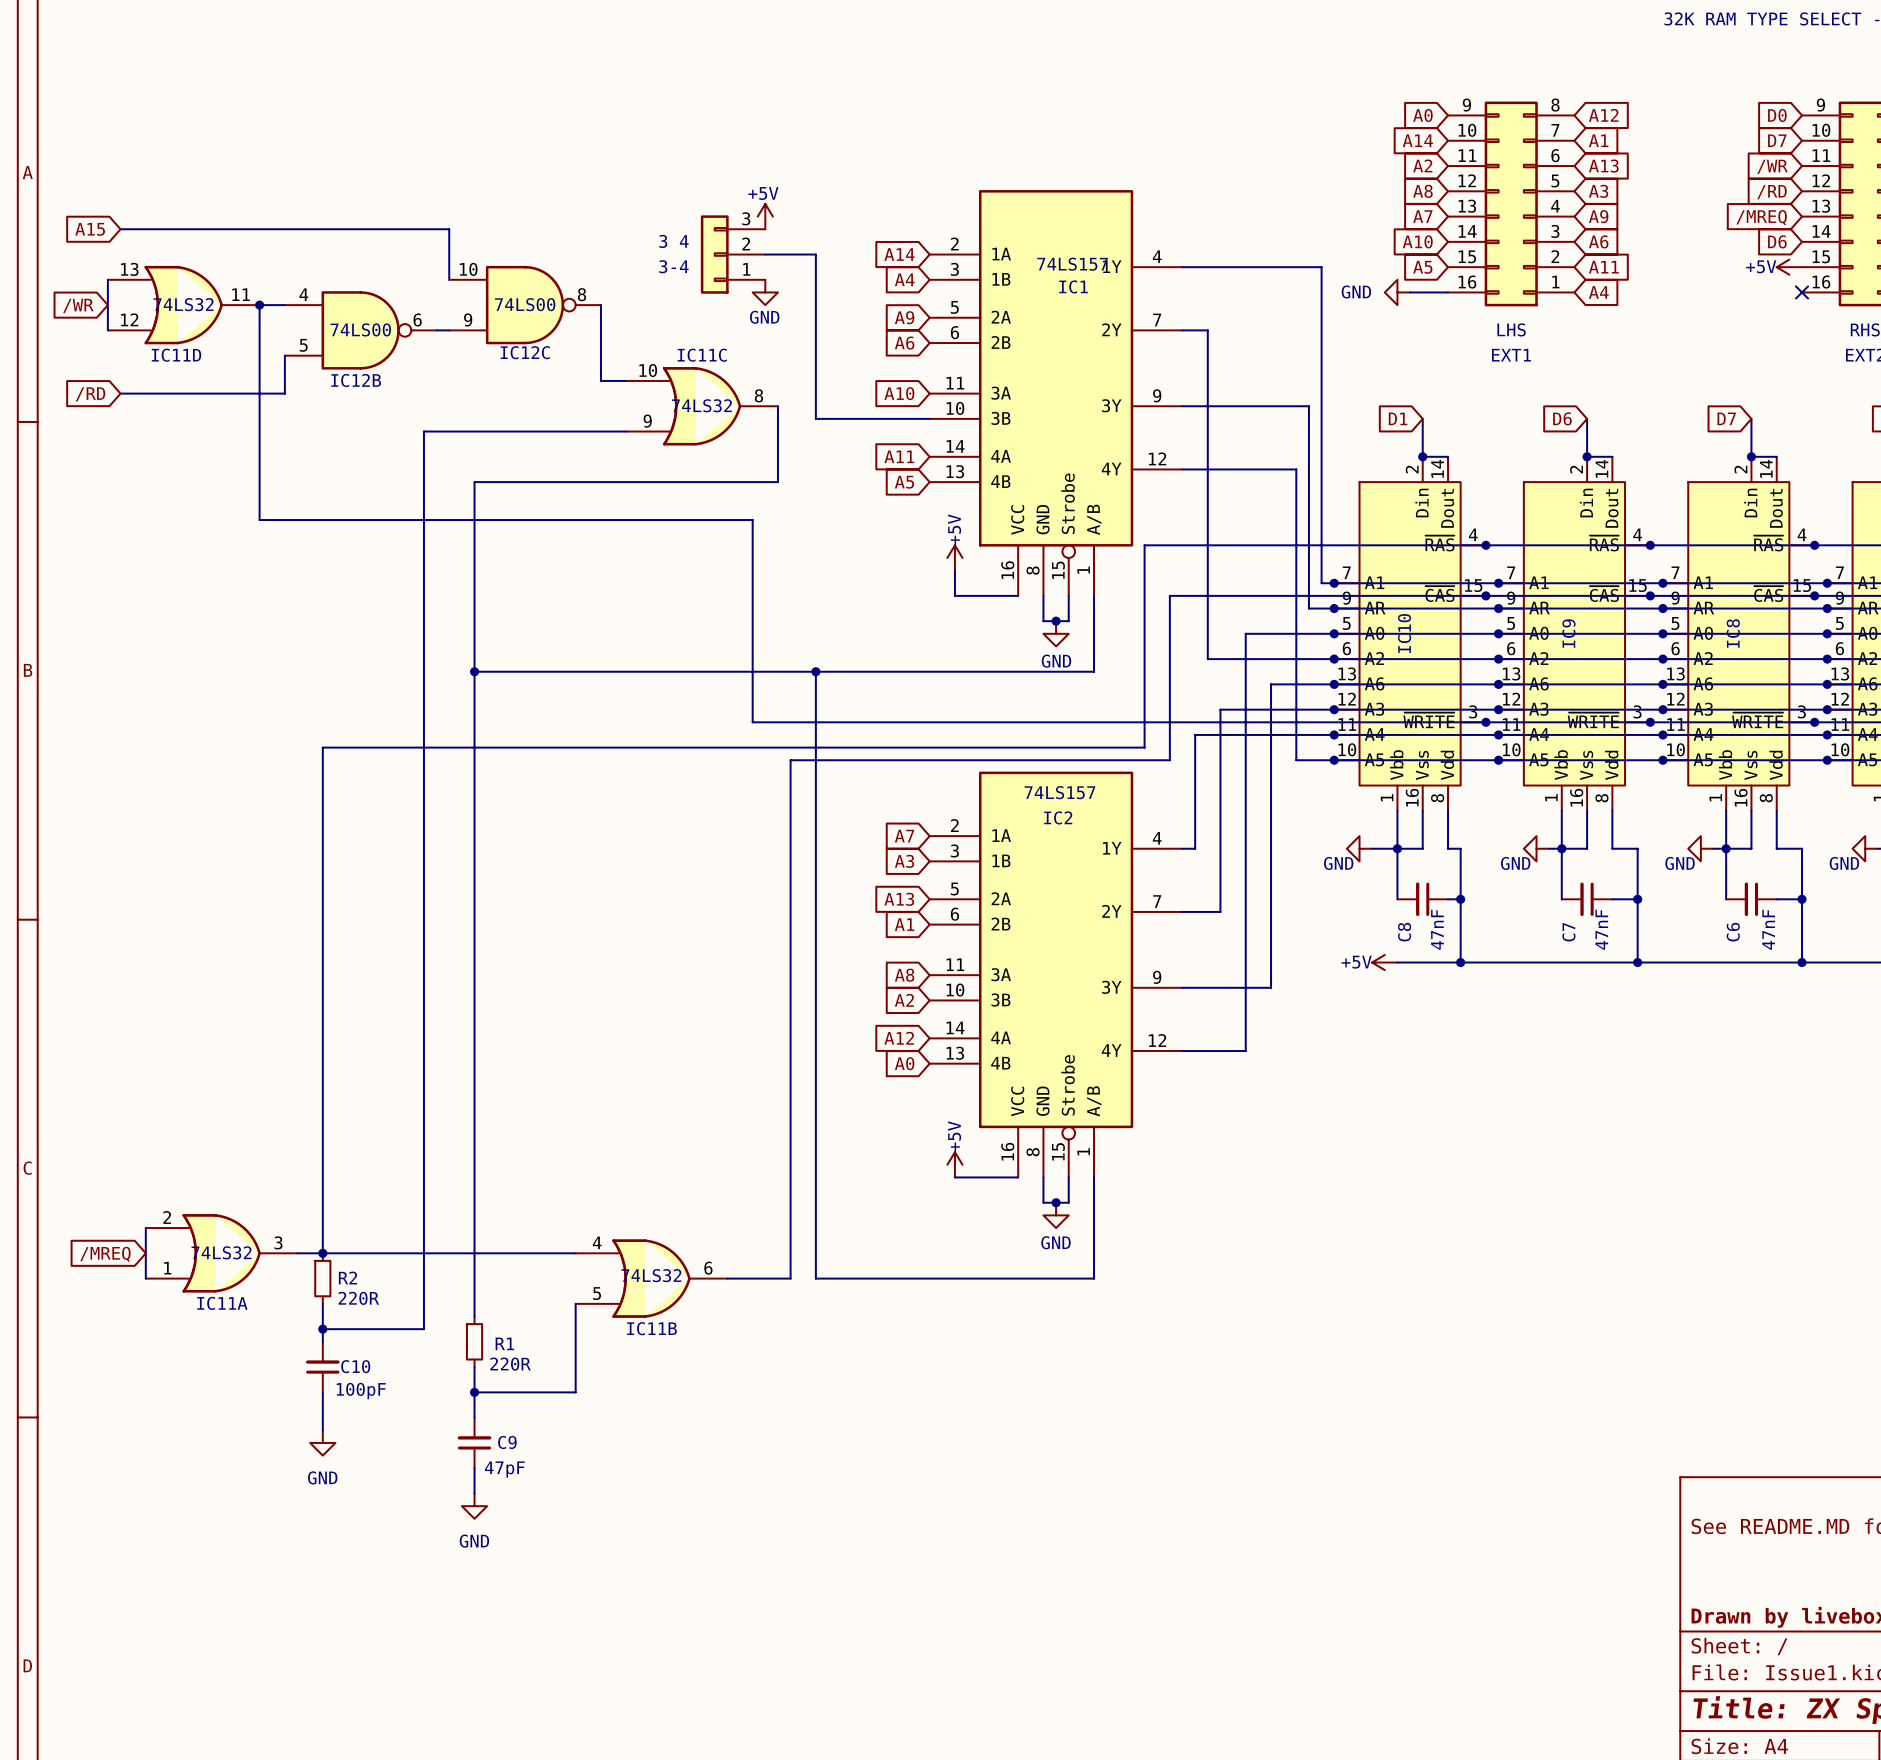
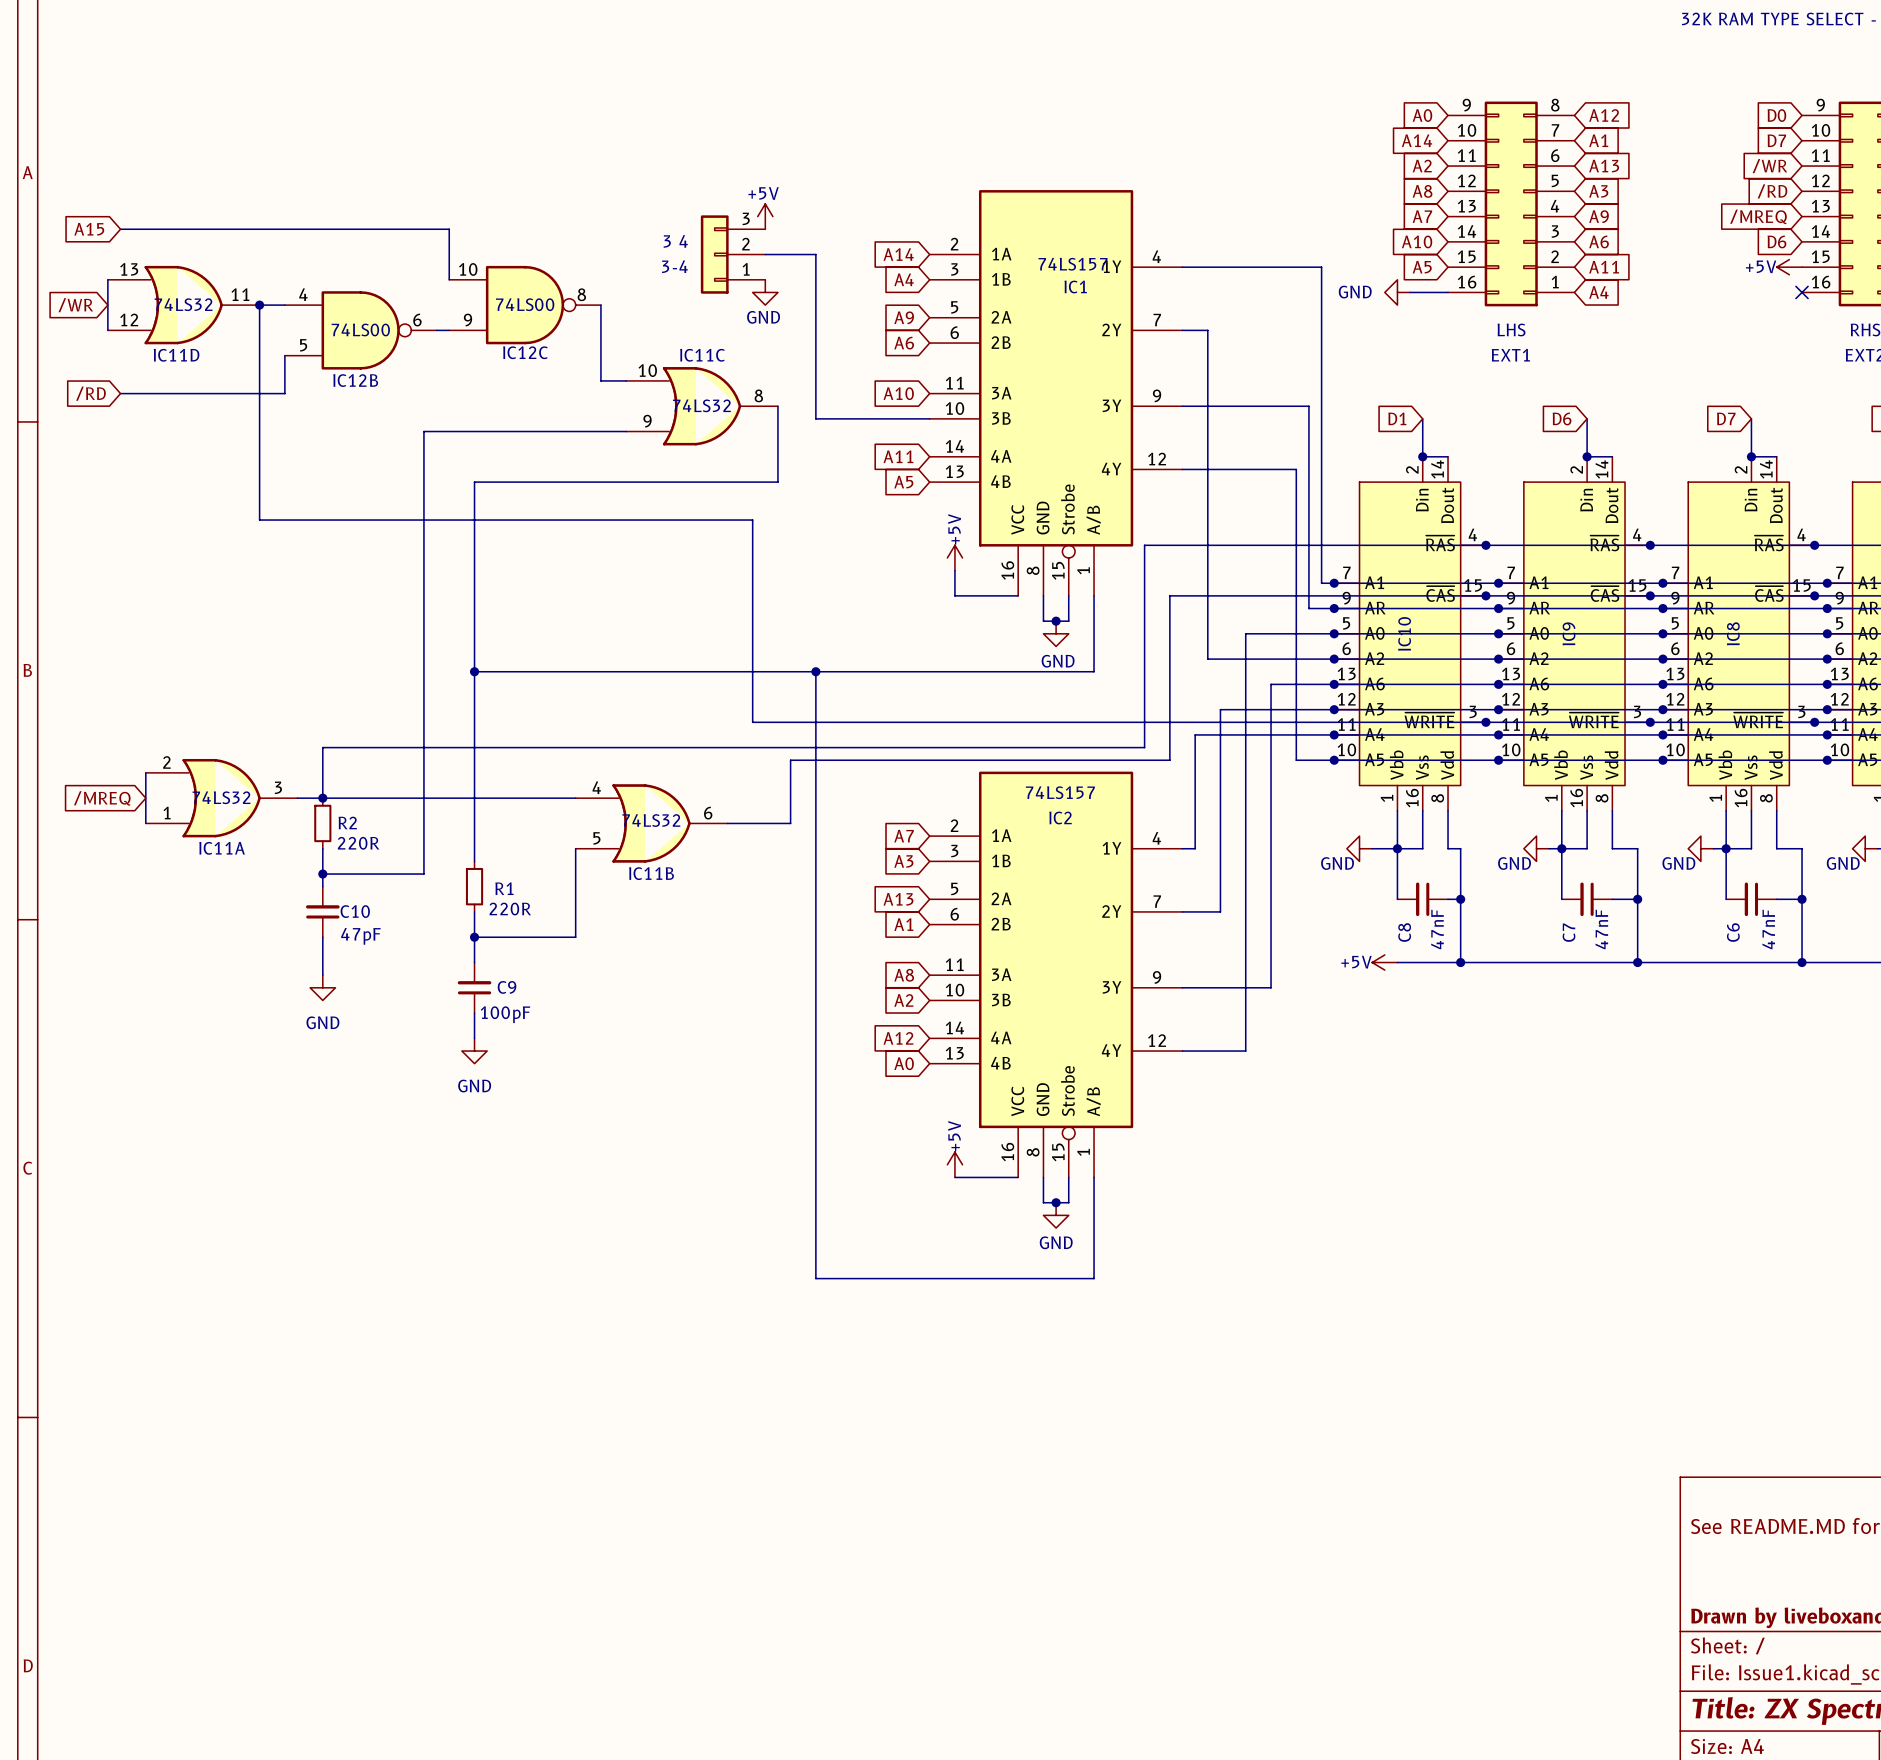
wire: none -> (297, 798) (575, 798)
wire: (322, 798) (322, 848) -> (145, 772) (145, 823)
junction: none -> (322, 798)
global label: none -> /MREQ (102, 798)
wire: (790, 823) (790, 1278) (727, 1278) -> (790, 823) (727, 823)
wire: none -> (575, 848) (575, 937) (474, 937)
wire: (474, 861) (474, 911) -> none
junction: none -> (322, 874)
wire: (423, 874) (423, 1329) (322, 1329) -> (423, 874) (322, 874)
junction: none -> (474, 937)
wire: (322, 975) (322, 1253) -> none
power symbol: none -> GND (322, 987)
wire: (474, 1038) (474, 1316) -> none
power symbol: none -> GND (474, 1051)
wire: (145, 1228) (145, 1278) -> none
IC11A position: (221, 1253) -> (221, 798)
wire: (297, 1253) (575, 1253) -> none
junction: (322, 1253) -> none
global label: /MREQ (105, 1254) -> none
R2 position: (322, 1278) -> (322, 823)
IC11B position: (651, 1278) -> (651, 823)
wire: (322, 1303) (322, 1341) -> none
wire: (575, 1303) (575, 1392) (474, 1392) -> none
junction: (322, 1329) -> none
R1 position: (474, 1341) -> (474, 886)
C10 position: (322, 1367) -> (322, 911)
wire: (474, 1367) (474, 1417) -> none
C10 value: 100pF (361, 1391) -> 47pF (360, 936)
wire: (322, 1392) (322, 1430) -> none
junction: (474, 1392) -> none
power symbol: GND (322, 1442) -> none
C9 position: (474, 1442) -> (474, 987)
wire: (474, 1468) (474, 1493) -> none
C9 value: 47pF (504, 1469) -> 100pF (505, 1014)
power symbol: GND (474, 1506) -> none

